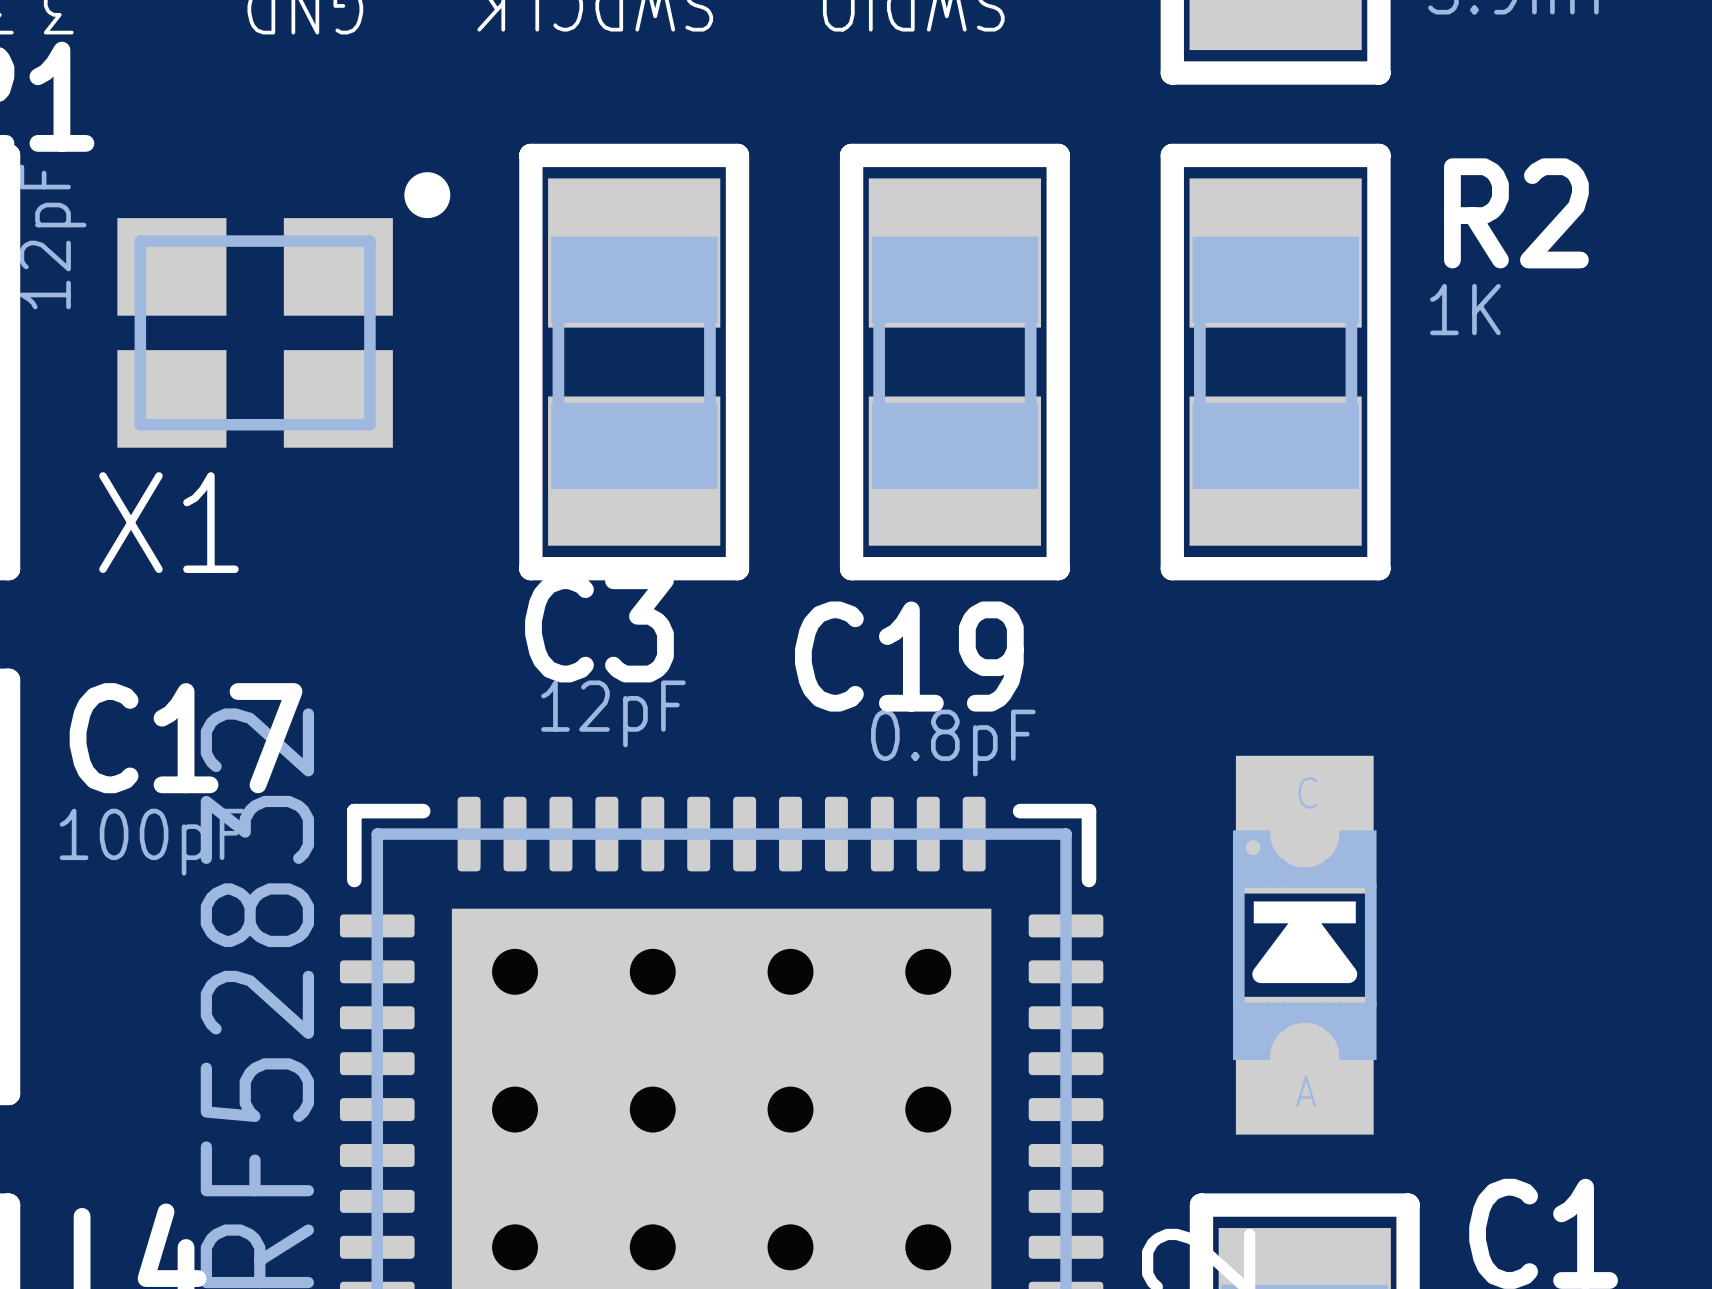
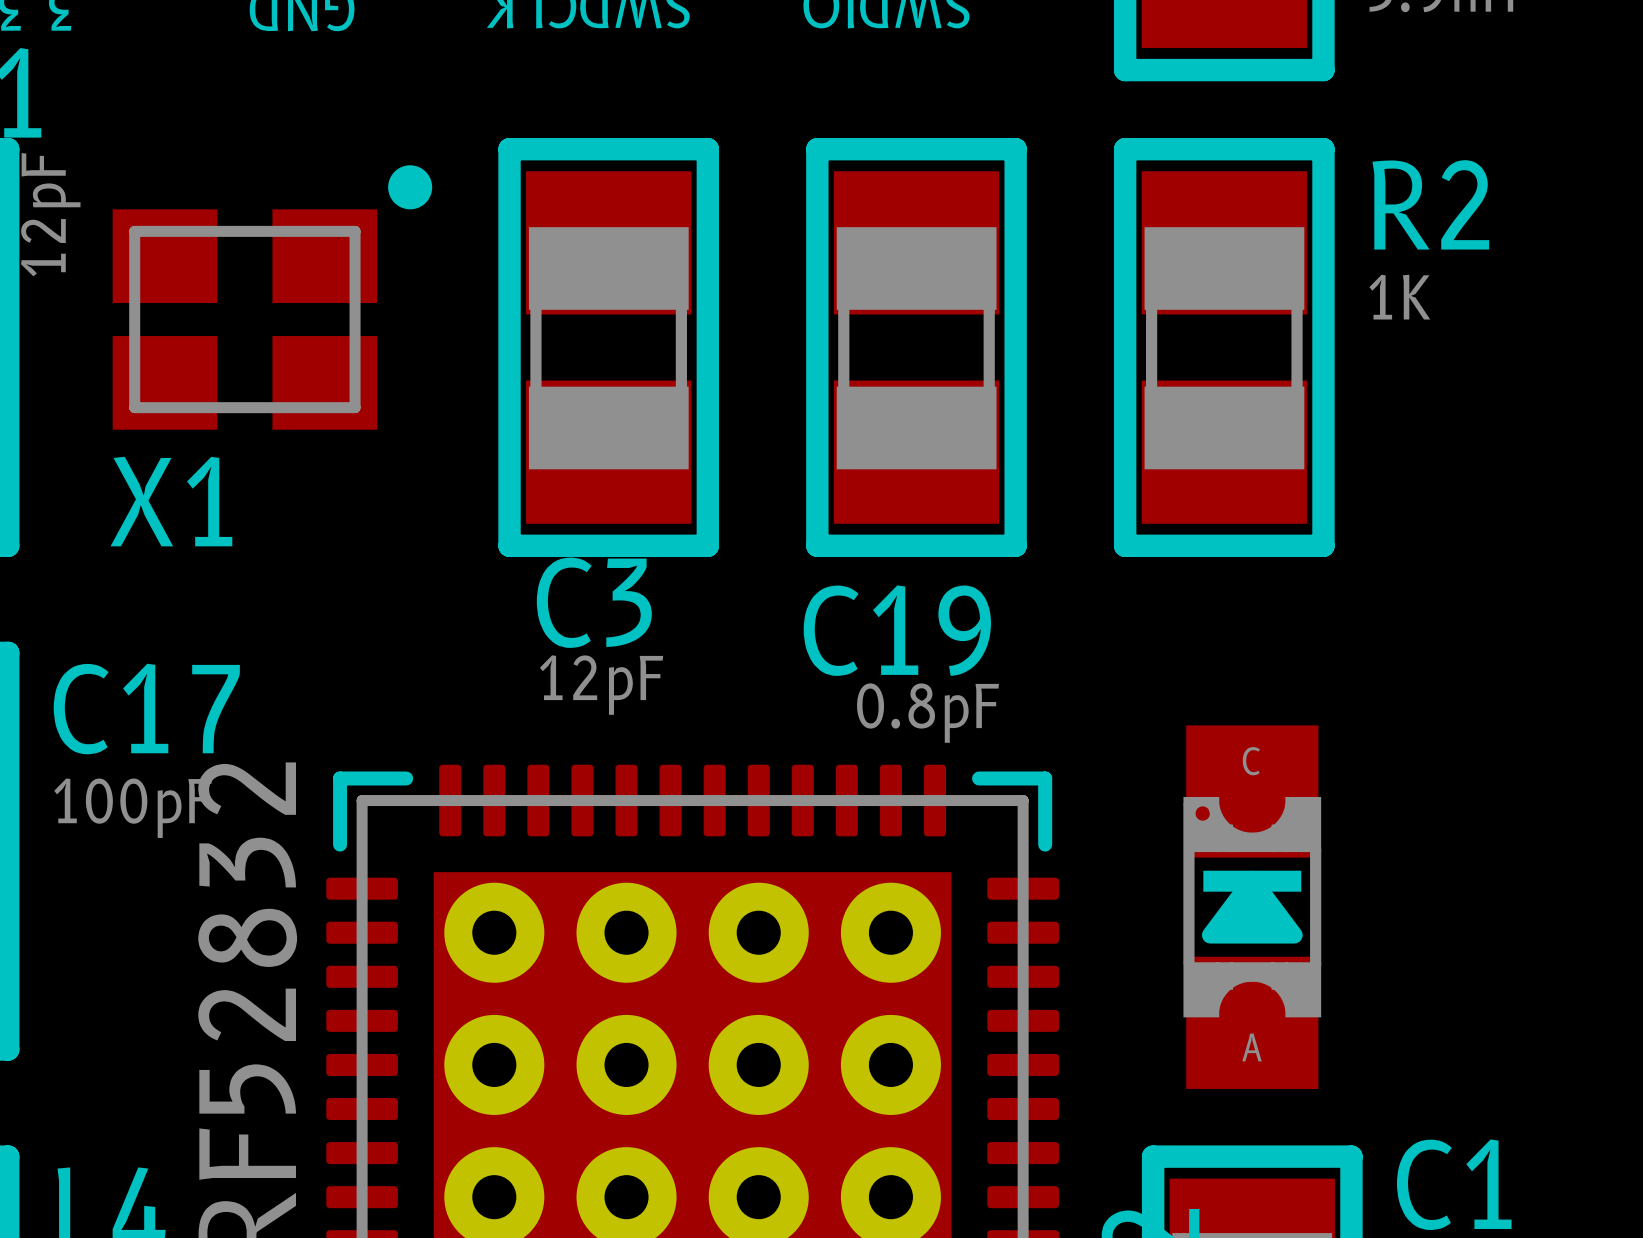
part footprint: [1232, 755, 1377, 1135] -> [1183, 725, 1322, 1089]

